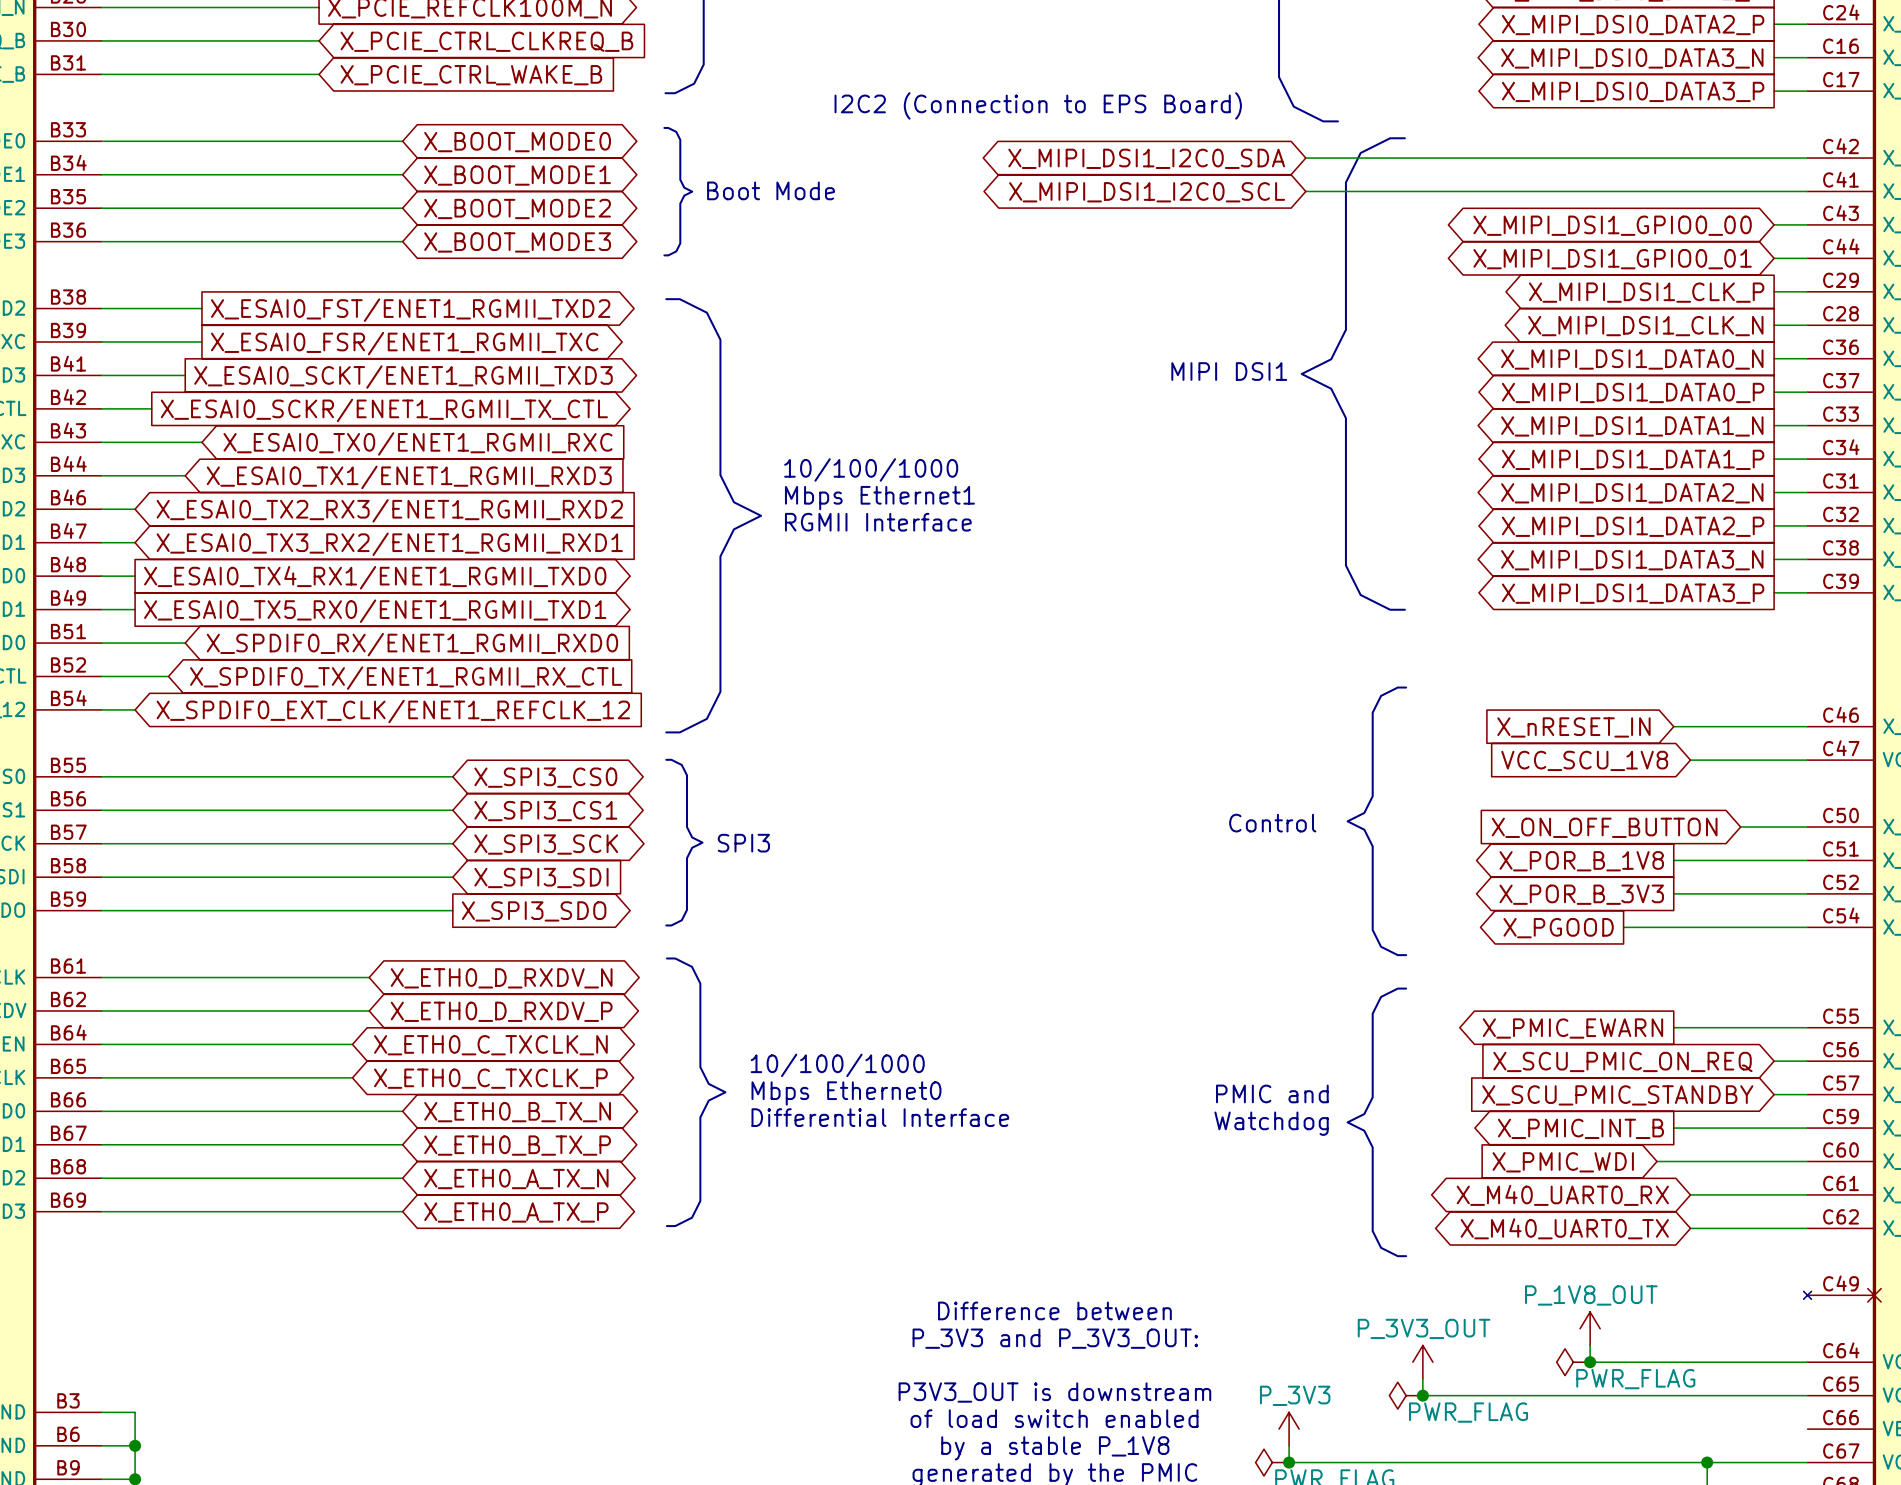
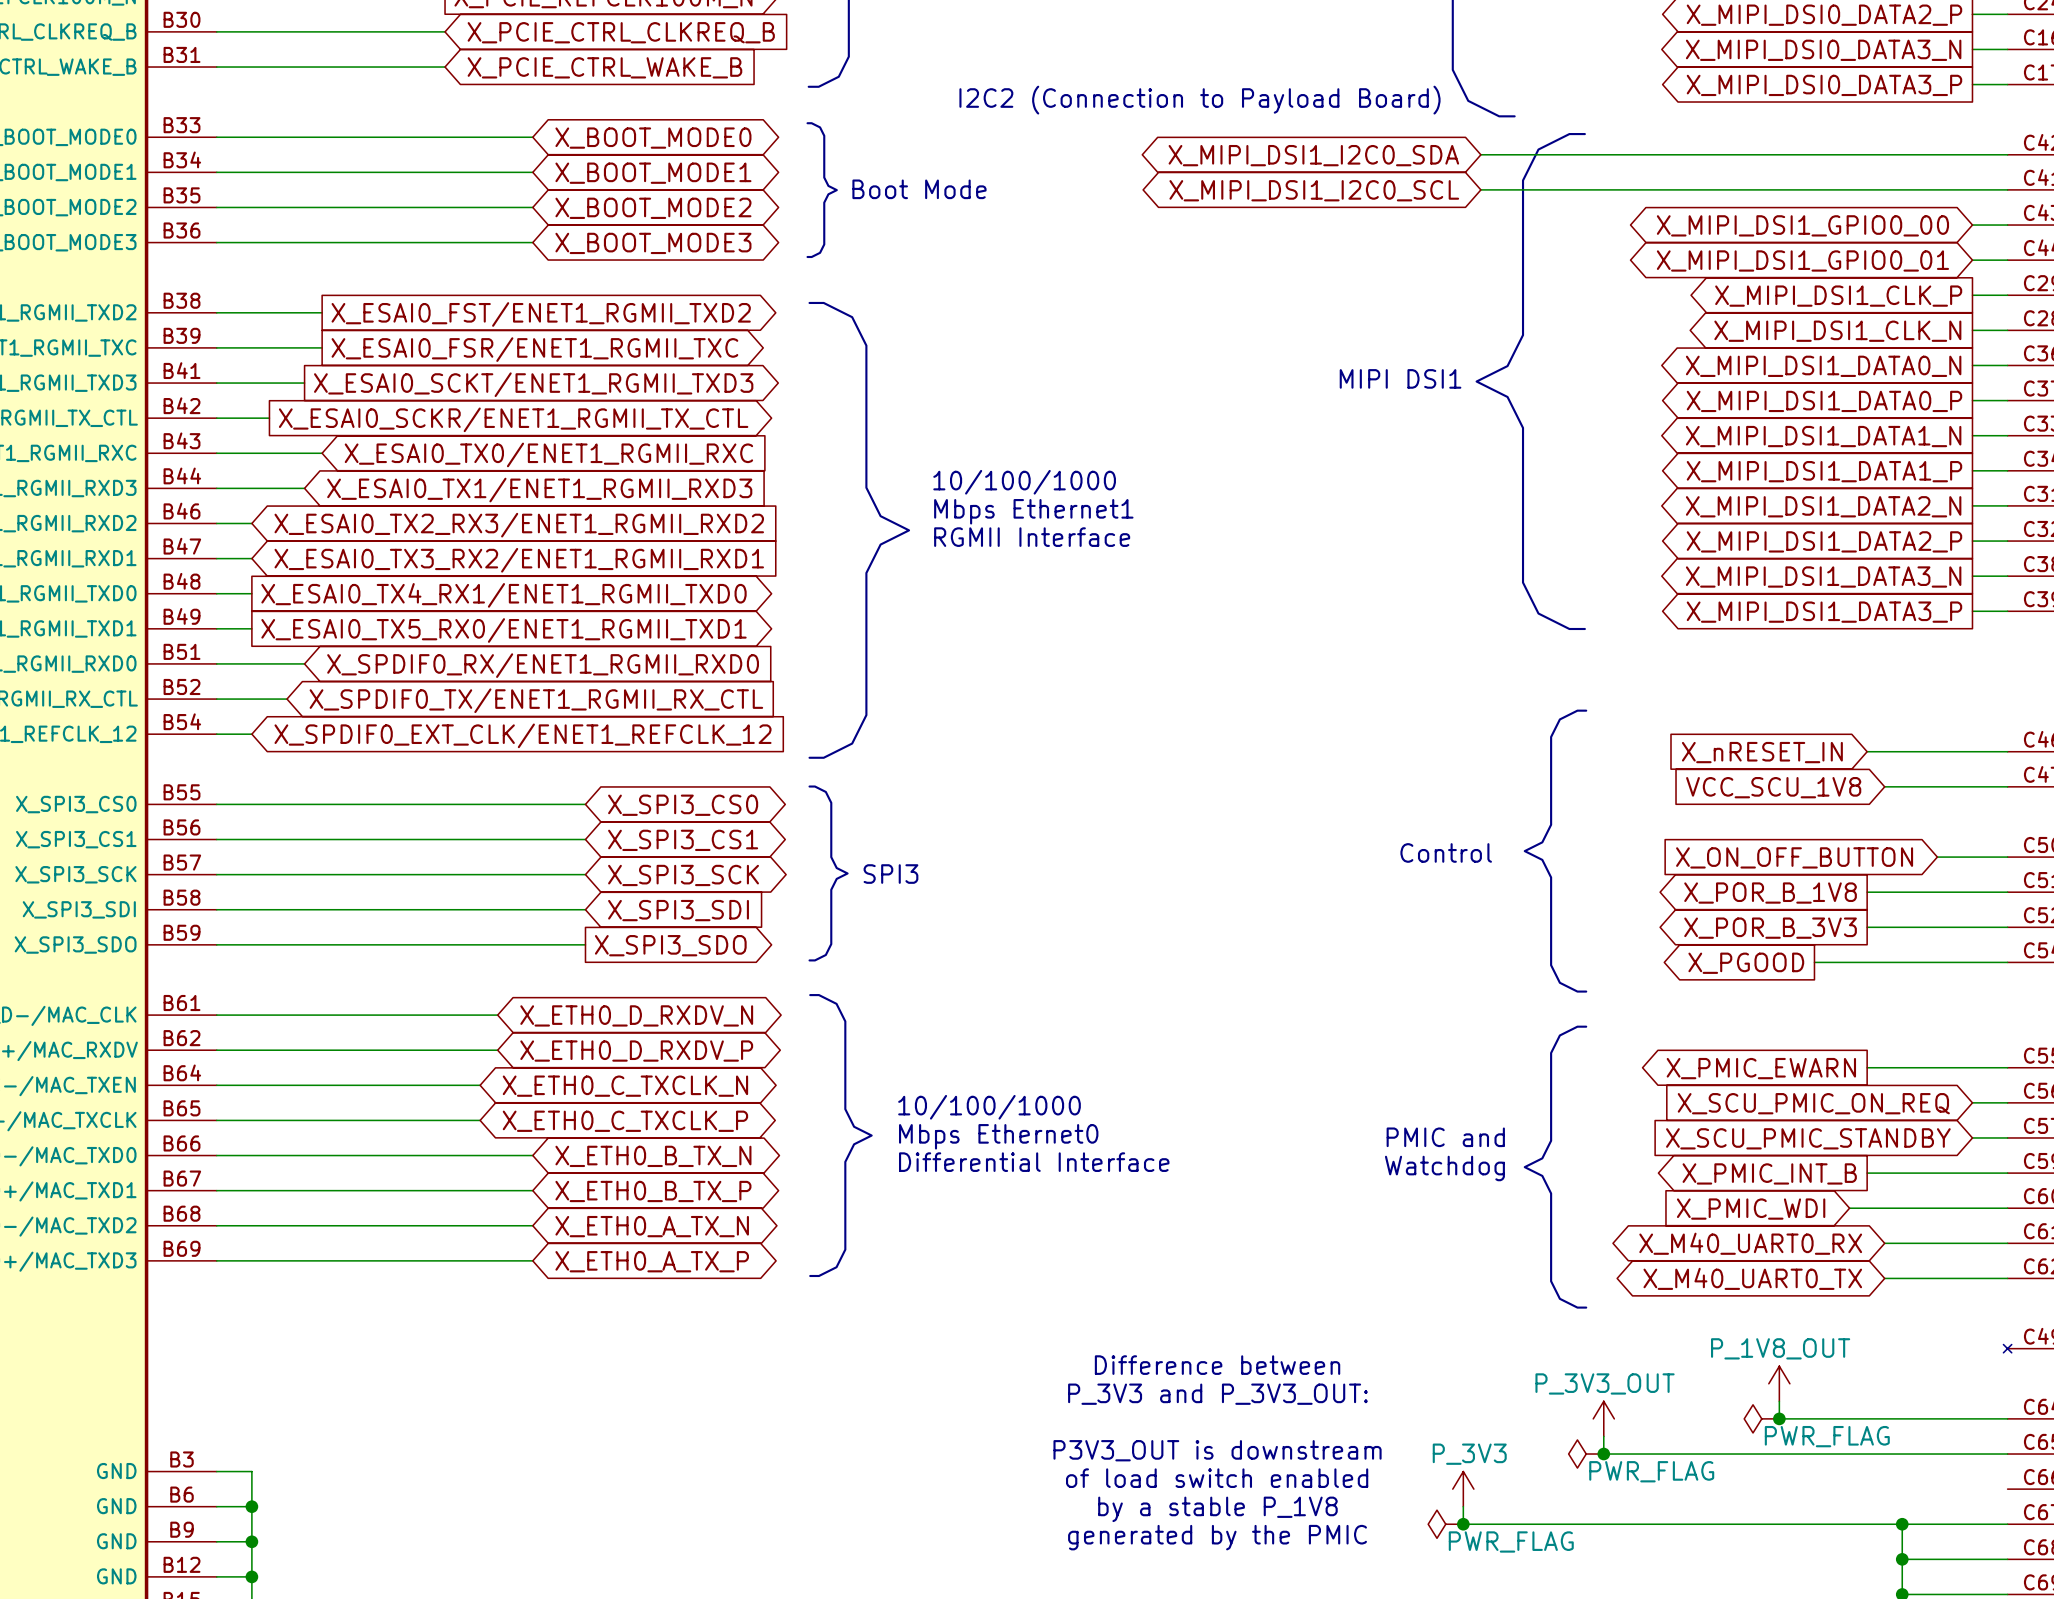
text: I2C2 (Connection to EPS Board) (1038, 105) -> I2C2 (Connection to Payload Board) (1199, 100)

